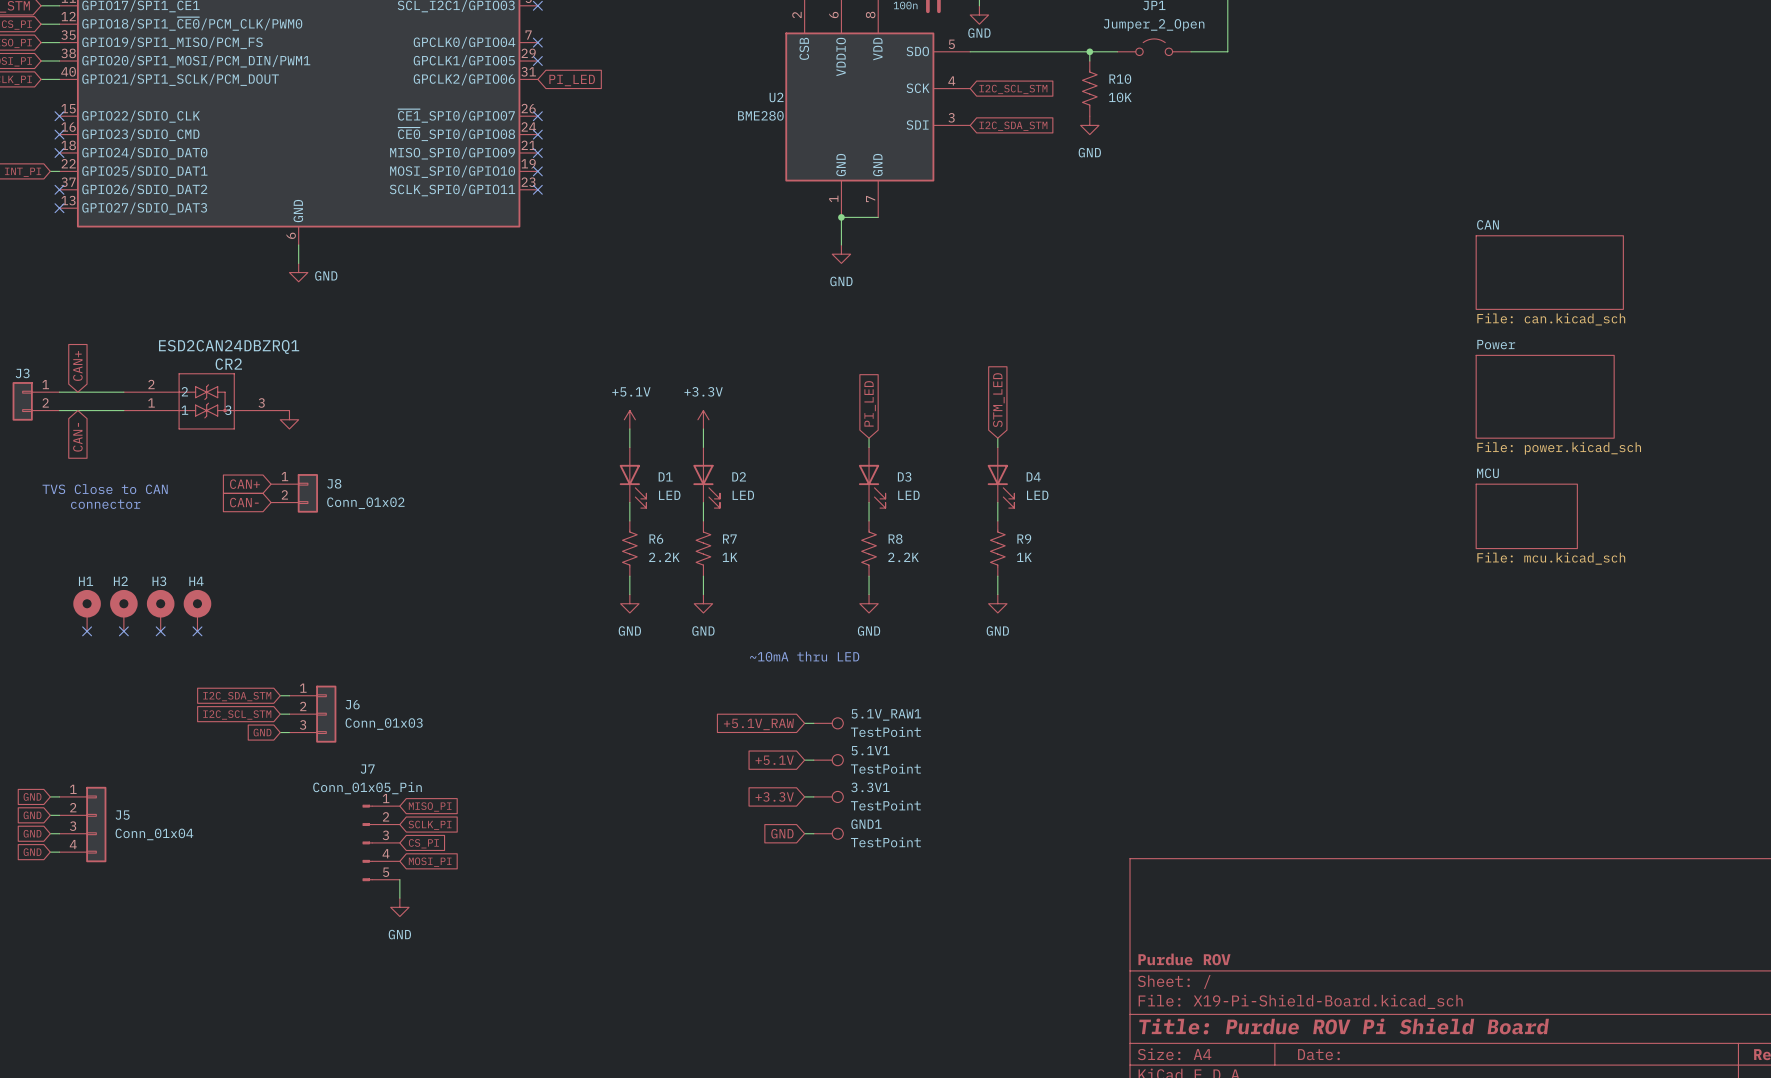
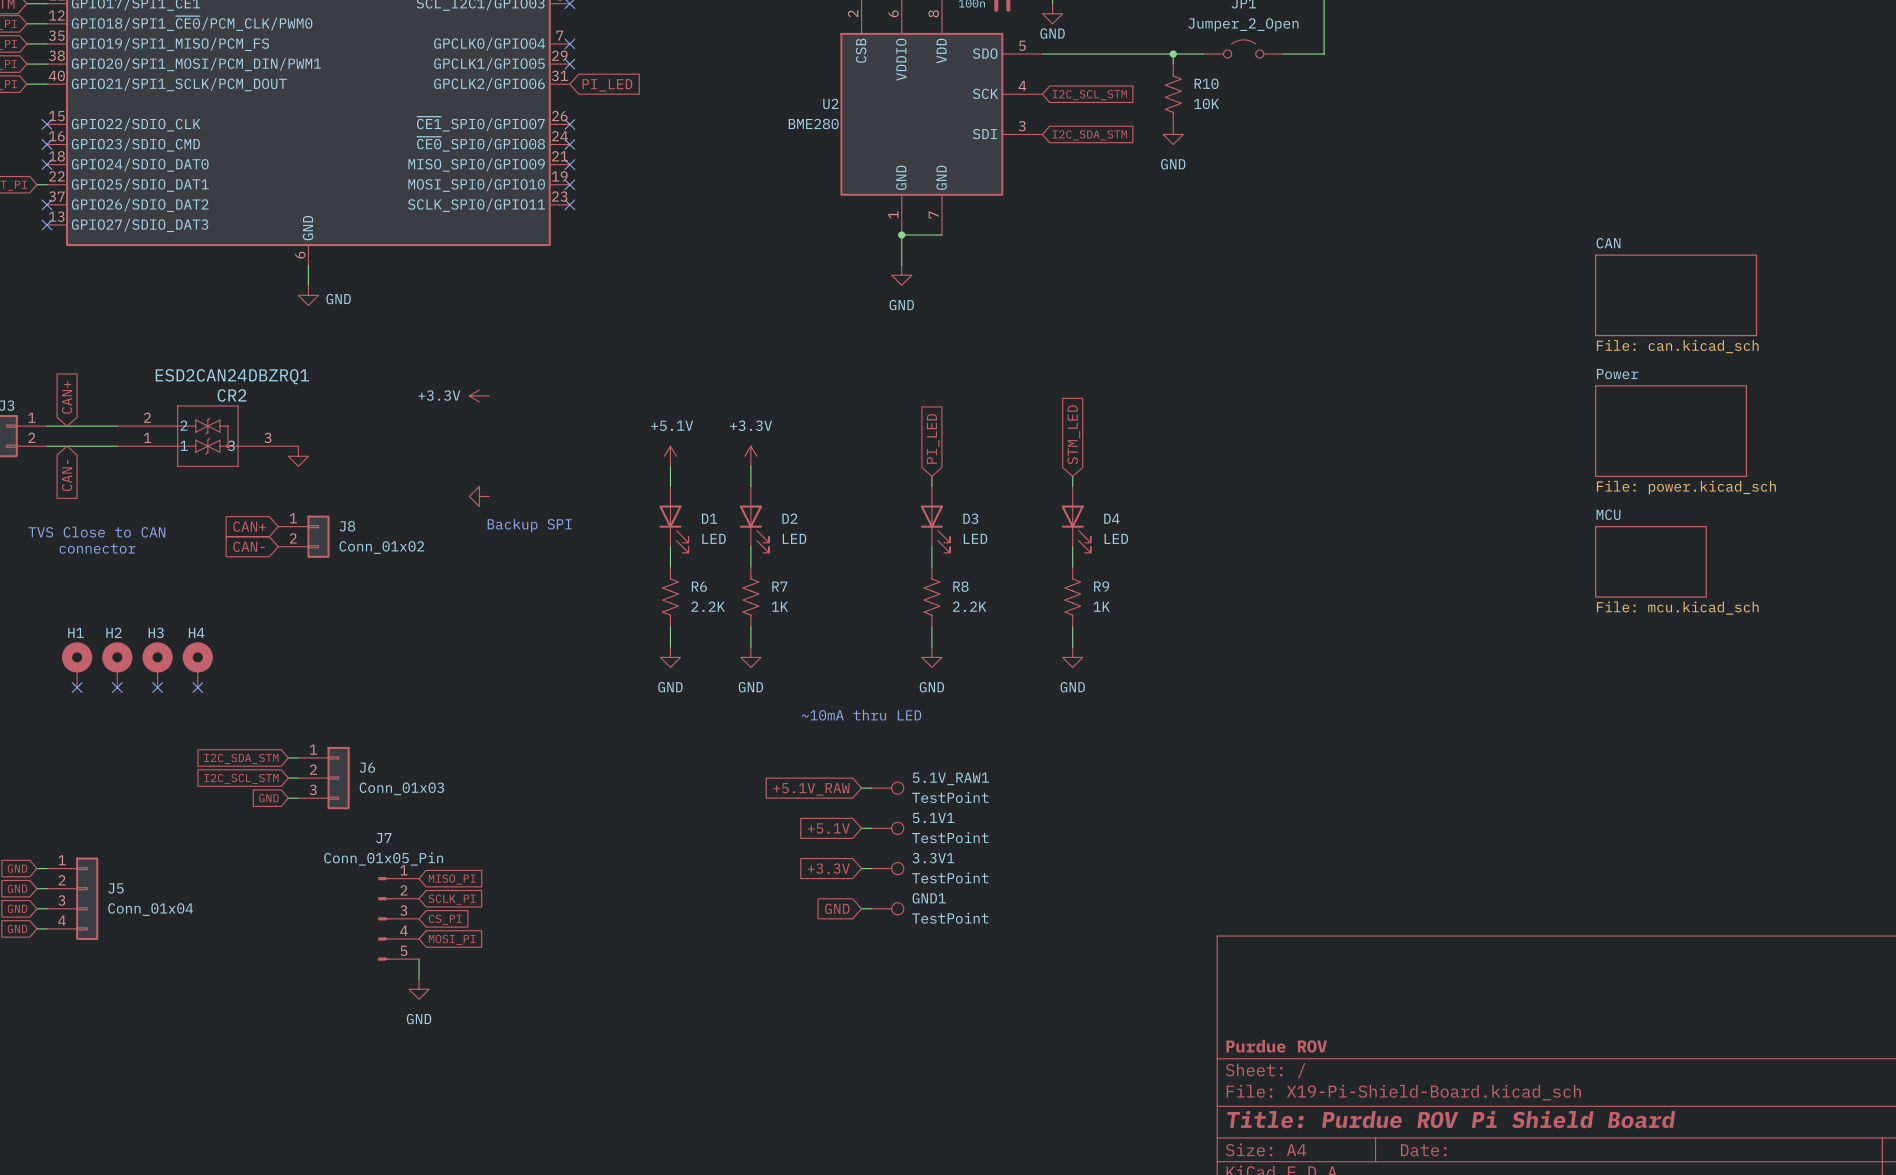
power symbol: none -> +3.3V (479, 395)
power symbol: none -> (479, 496)
text: none -> Backup SPI (529, 525)

